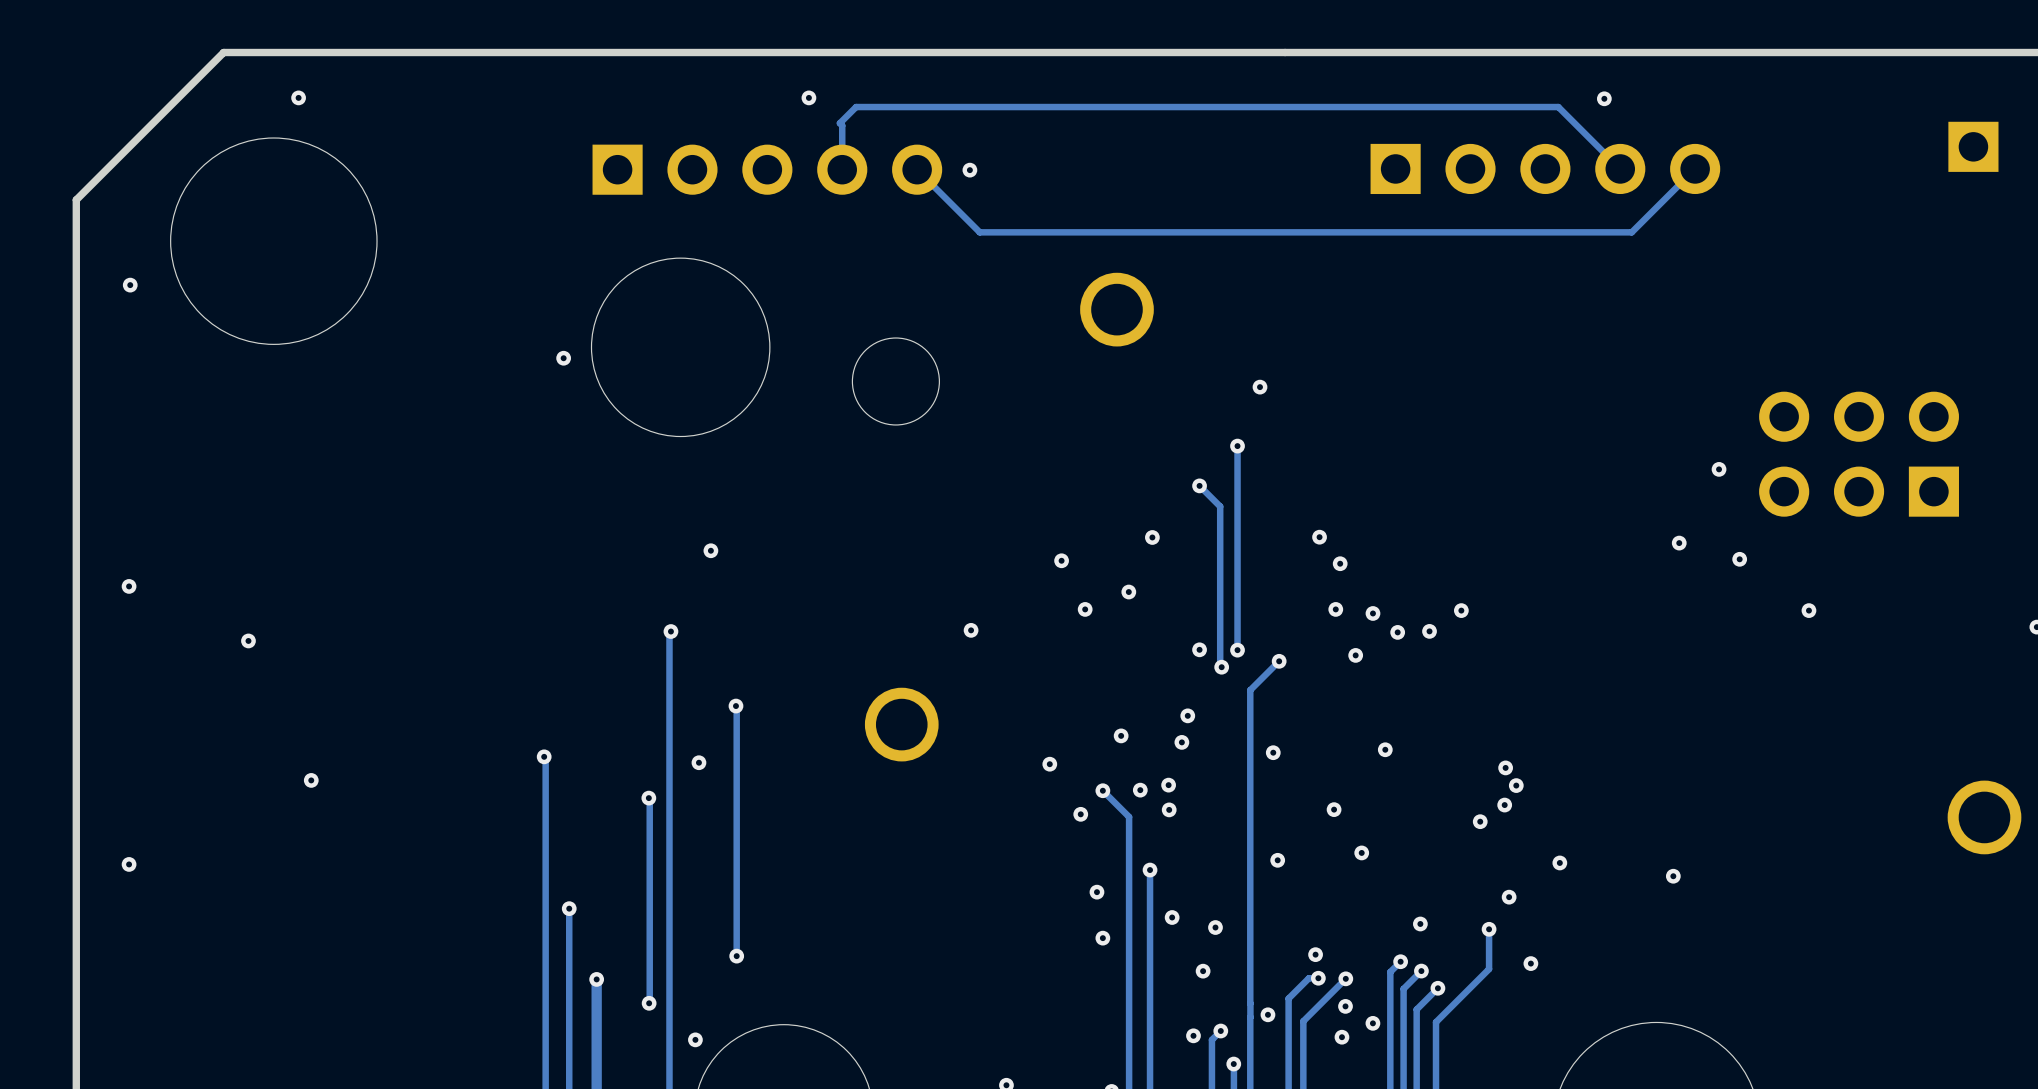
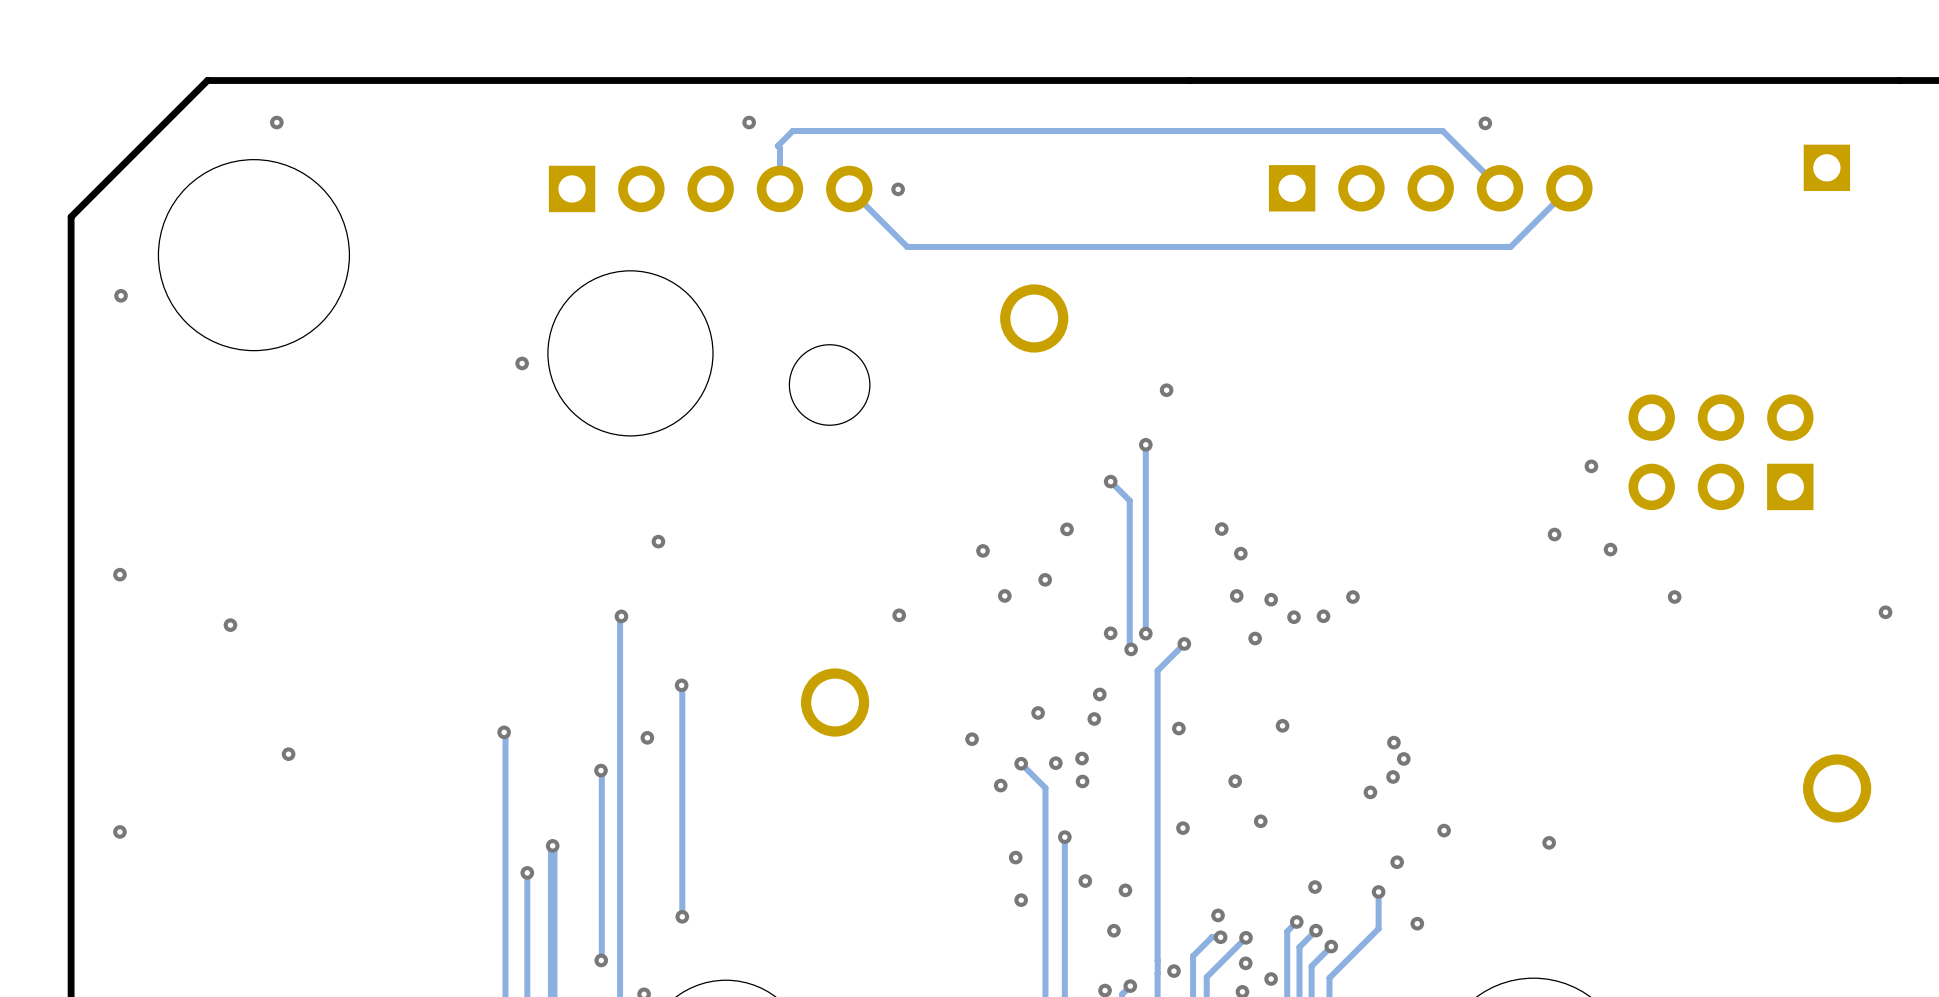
track: none -> (552, 845) (552, 938)
via position: (596, 979) -> (552, 845)

